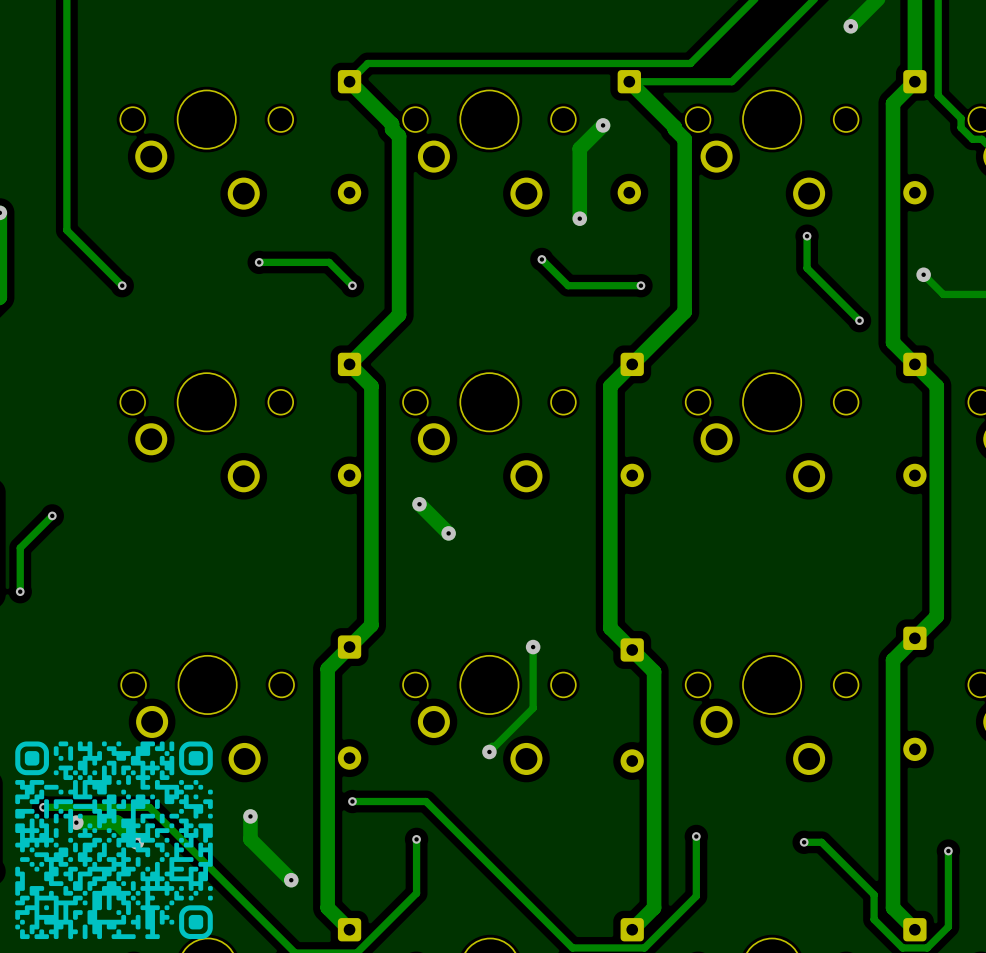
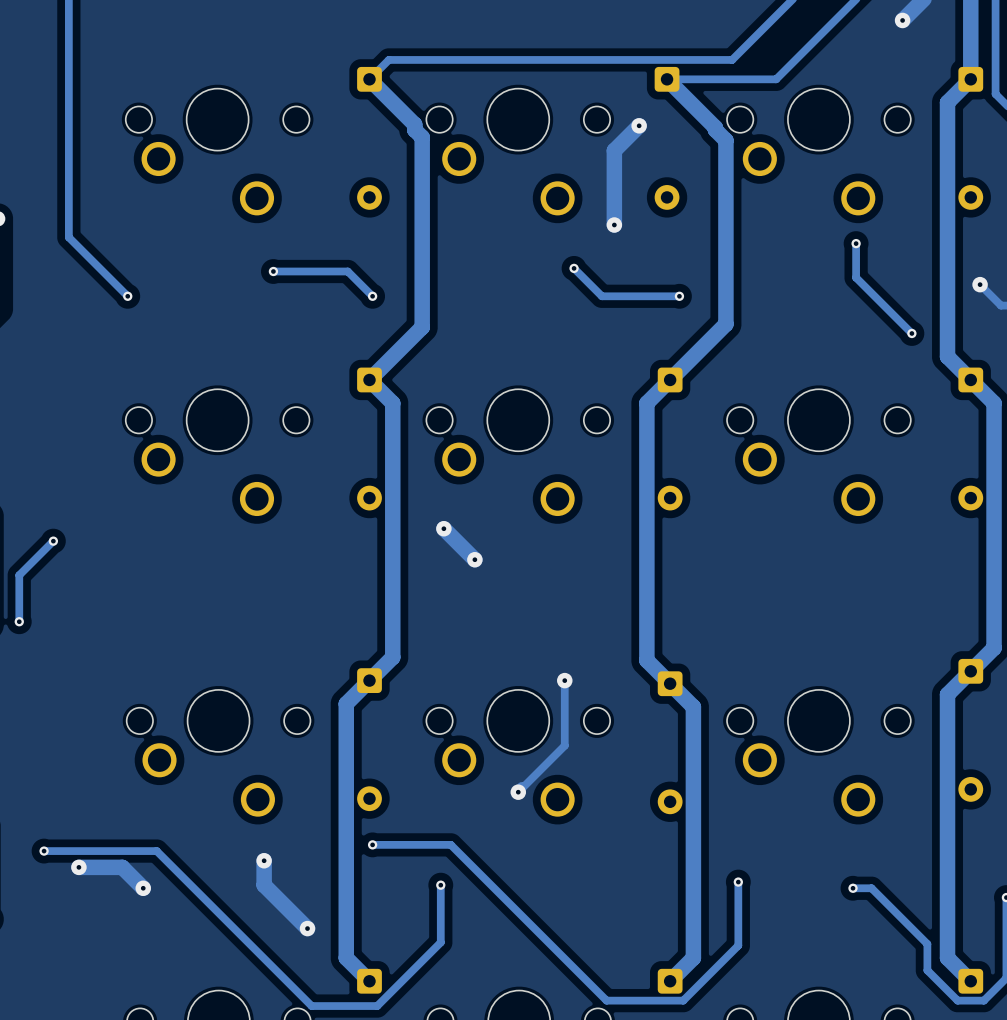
drawing: [15, 741, 213, 940] -> none

